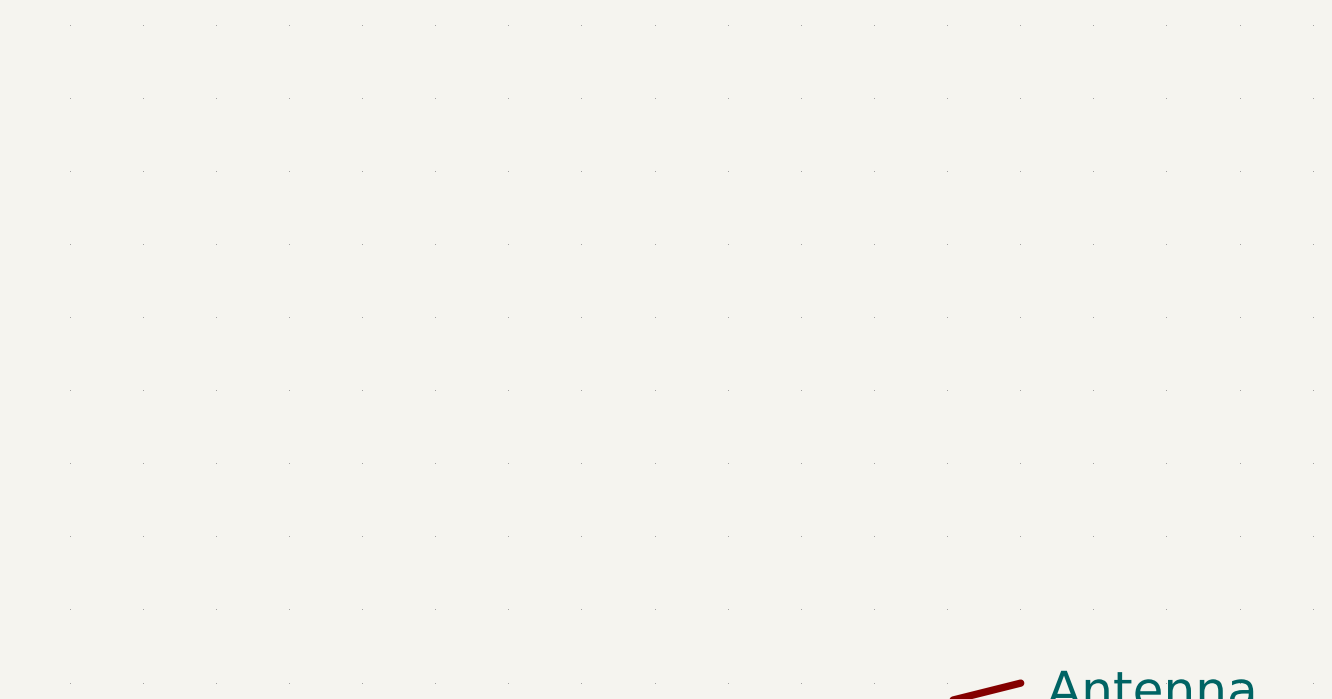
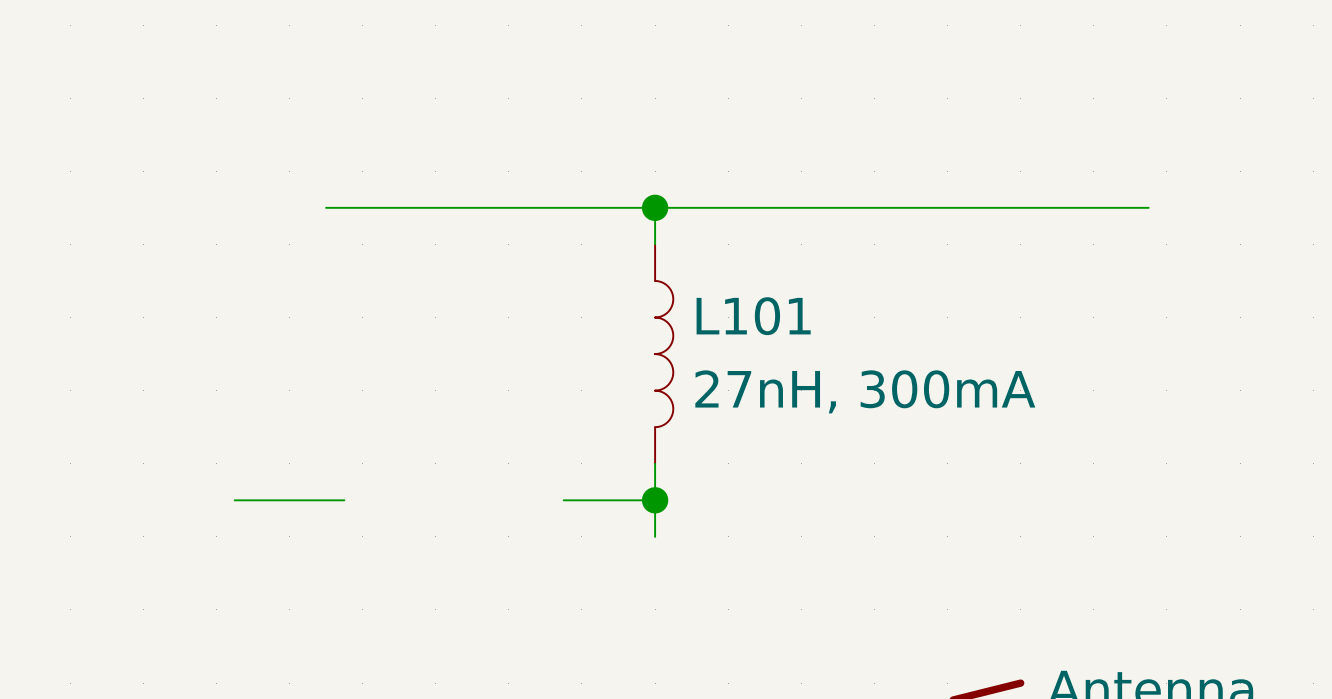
wire: none -> (326, 207) (1148, 207)
wire: none -> (655, 207) (655, 244)
junction: none -> (655, 207)
L101: none -> 27nH, 300mA (664, 354)
wire: none -> (655, 463) (655, 536)
wire: none -> (234, 500) (344, 500)
wire: none -> (563, 500) (655, 500)
junction: none -> (655, 500)

